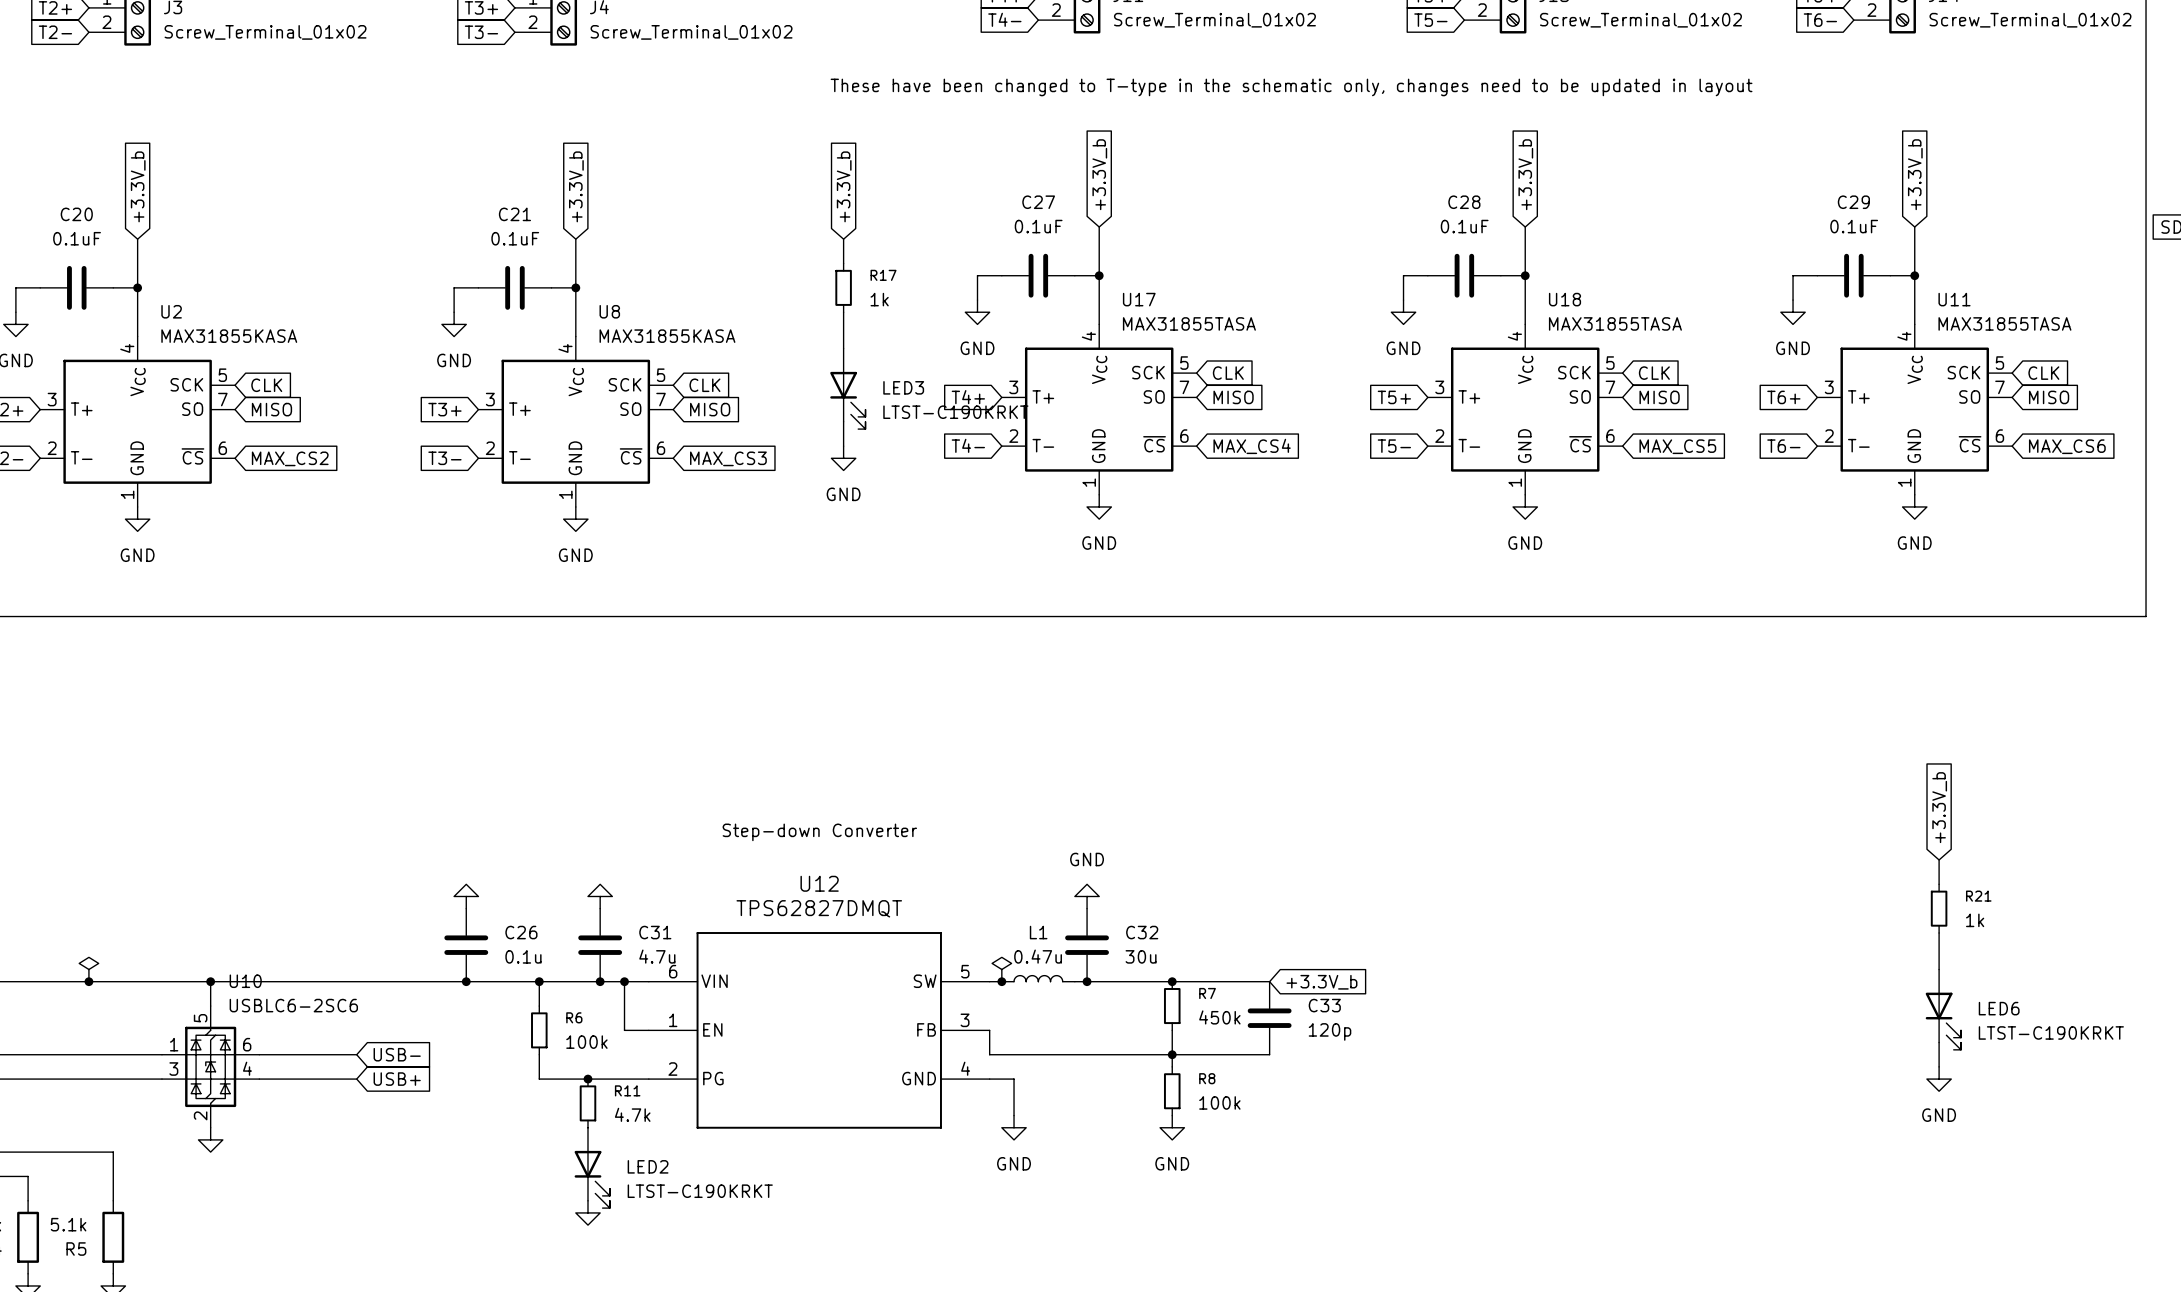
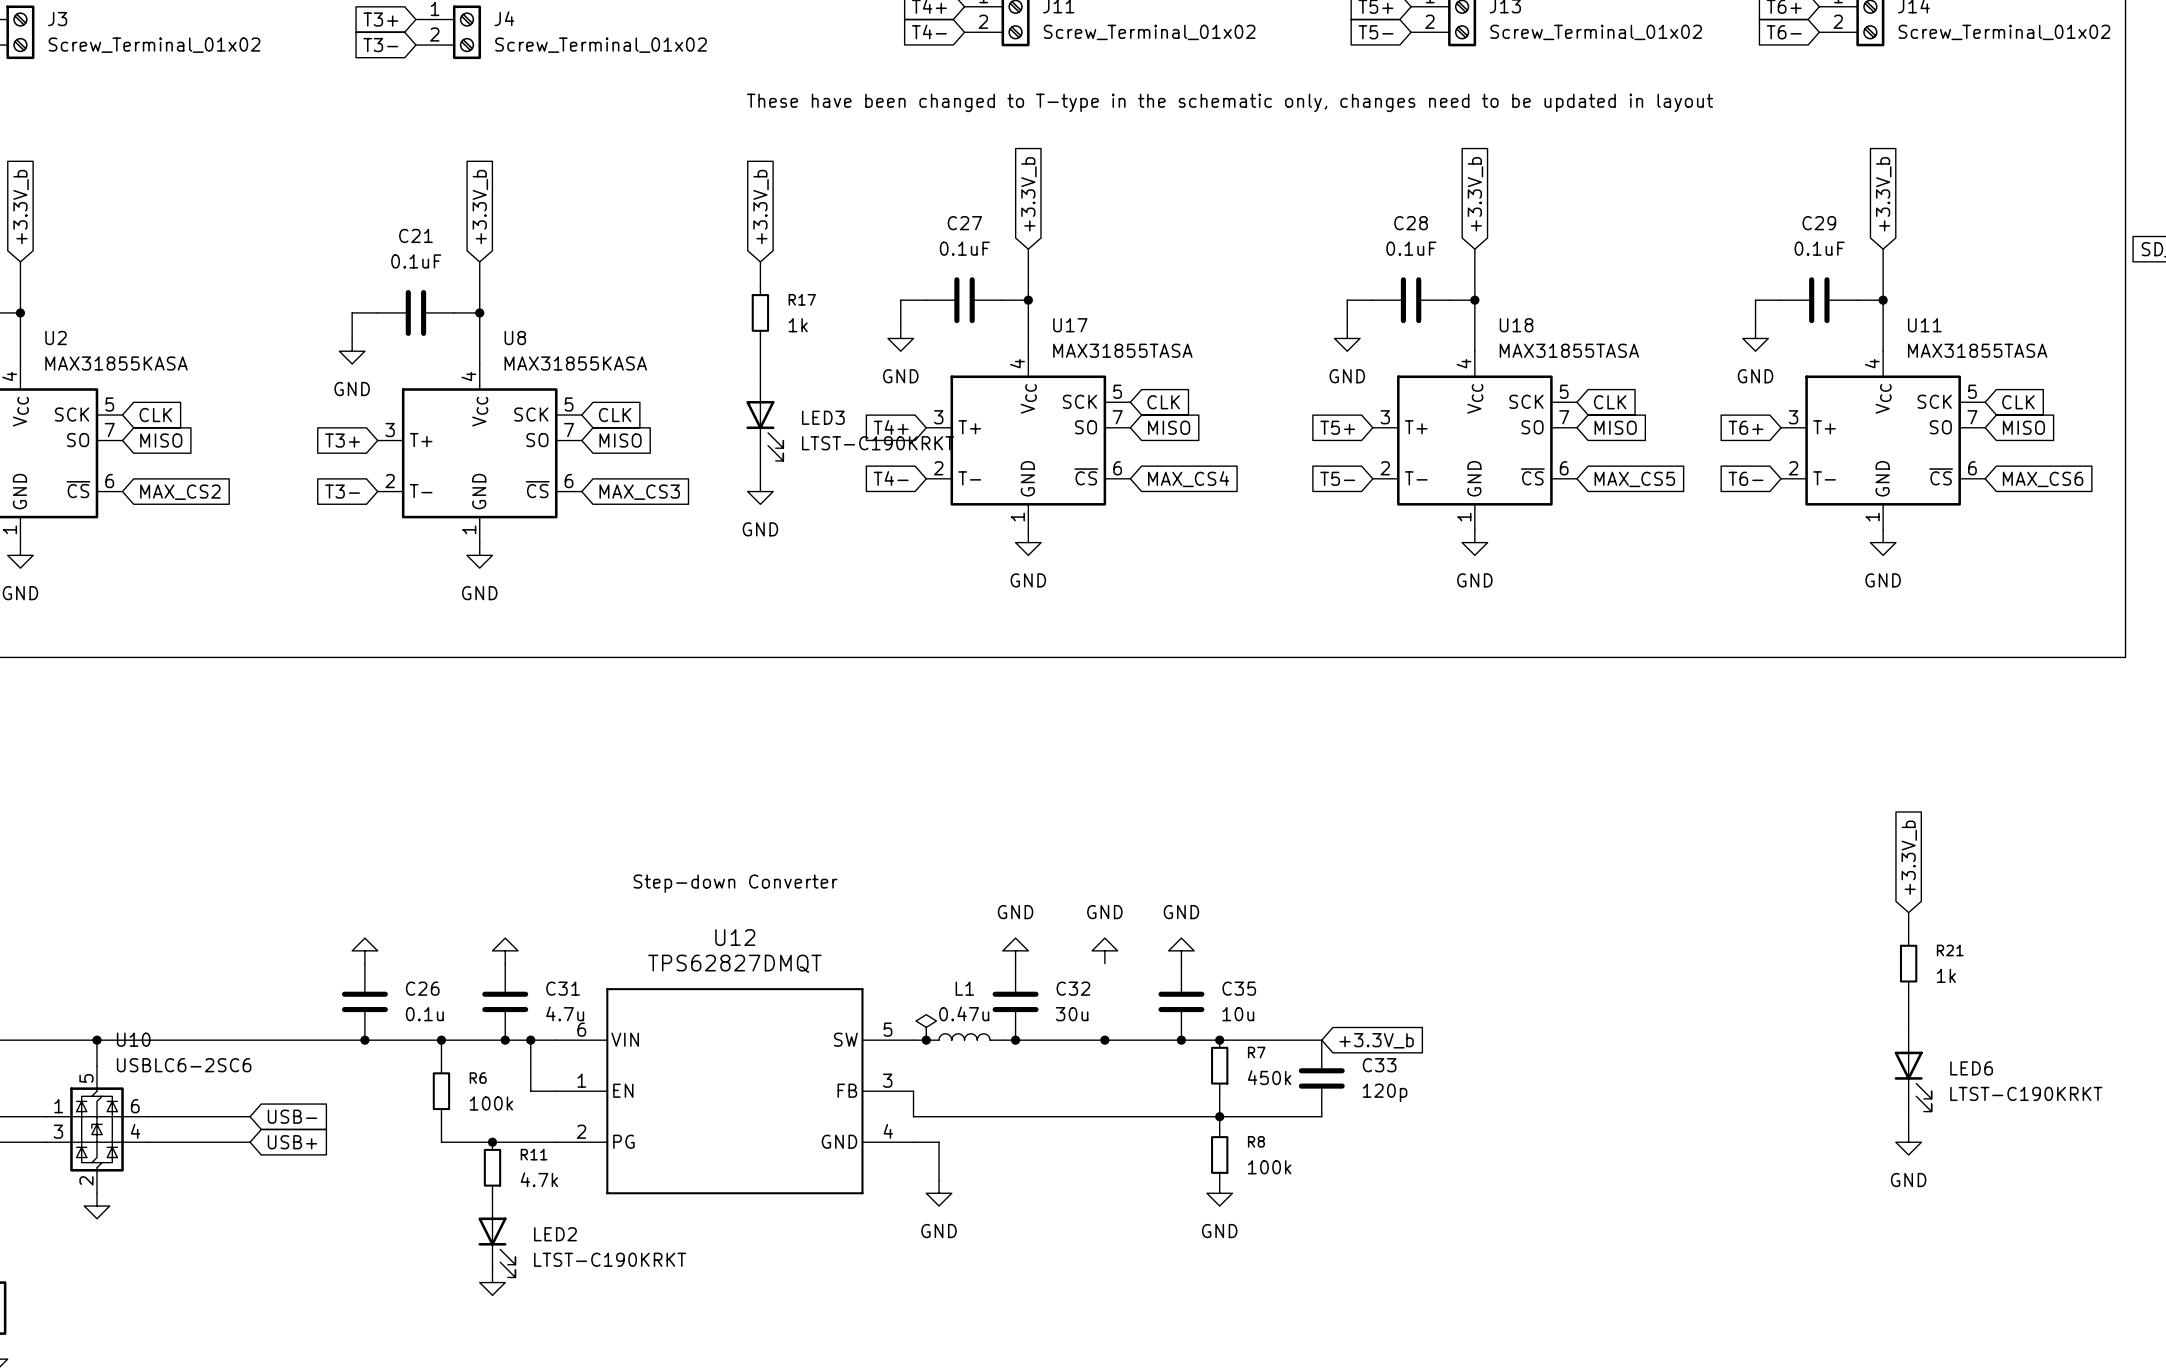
power symbol: none -> GND (1104, 950)
power symbol: none -> GND (1181, 950)
C35: none -> 10u (1181, 1001)
junction: none -> (1181, 1040)
wire: none -> (1206, 1040) (1321, 1040)
junction: none -> (1219, 1040)
global label position: +3.3V_b (1321, 982) -> +3.3V_b (1376, 1040)
R7 position: (1172, 1006) -> (1219, 1065)
C33 position: (1269, 1018) -> (1321, 1078)
wire: (1172, 1030) (1172, 1066) -> (1219, 1091) (1219, 1129)
junction: (1172, 1054) -> none
wire: none -> (1206, 1116) (1321, 1116)
junction: none -> (1219, 1116)
R8 position: (1172, 1091) -> (1219, 1154)
power symbol position: GND (1172, 1127) -> GND (1219, 1193)

